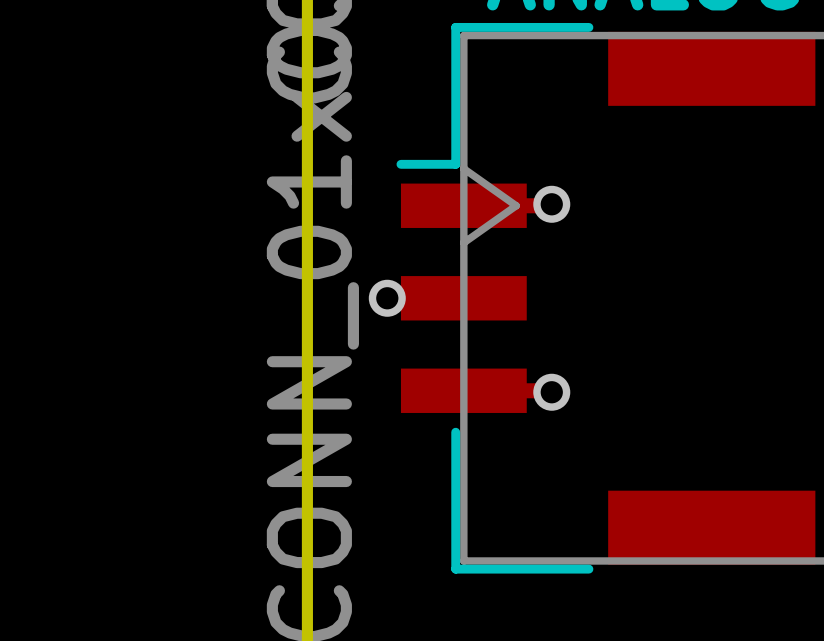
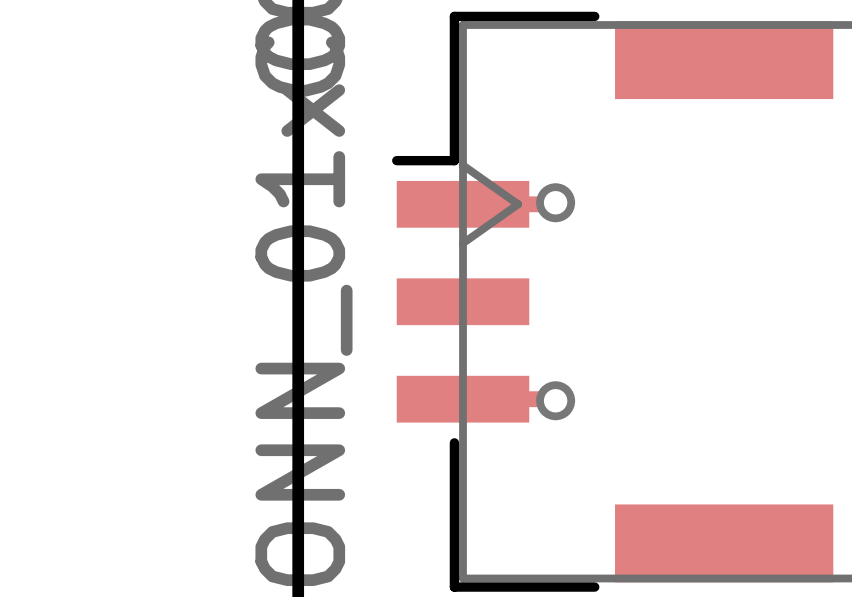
via: (387, 298) -> none

